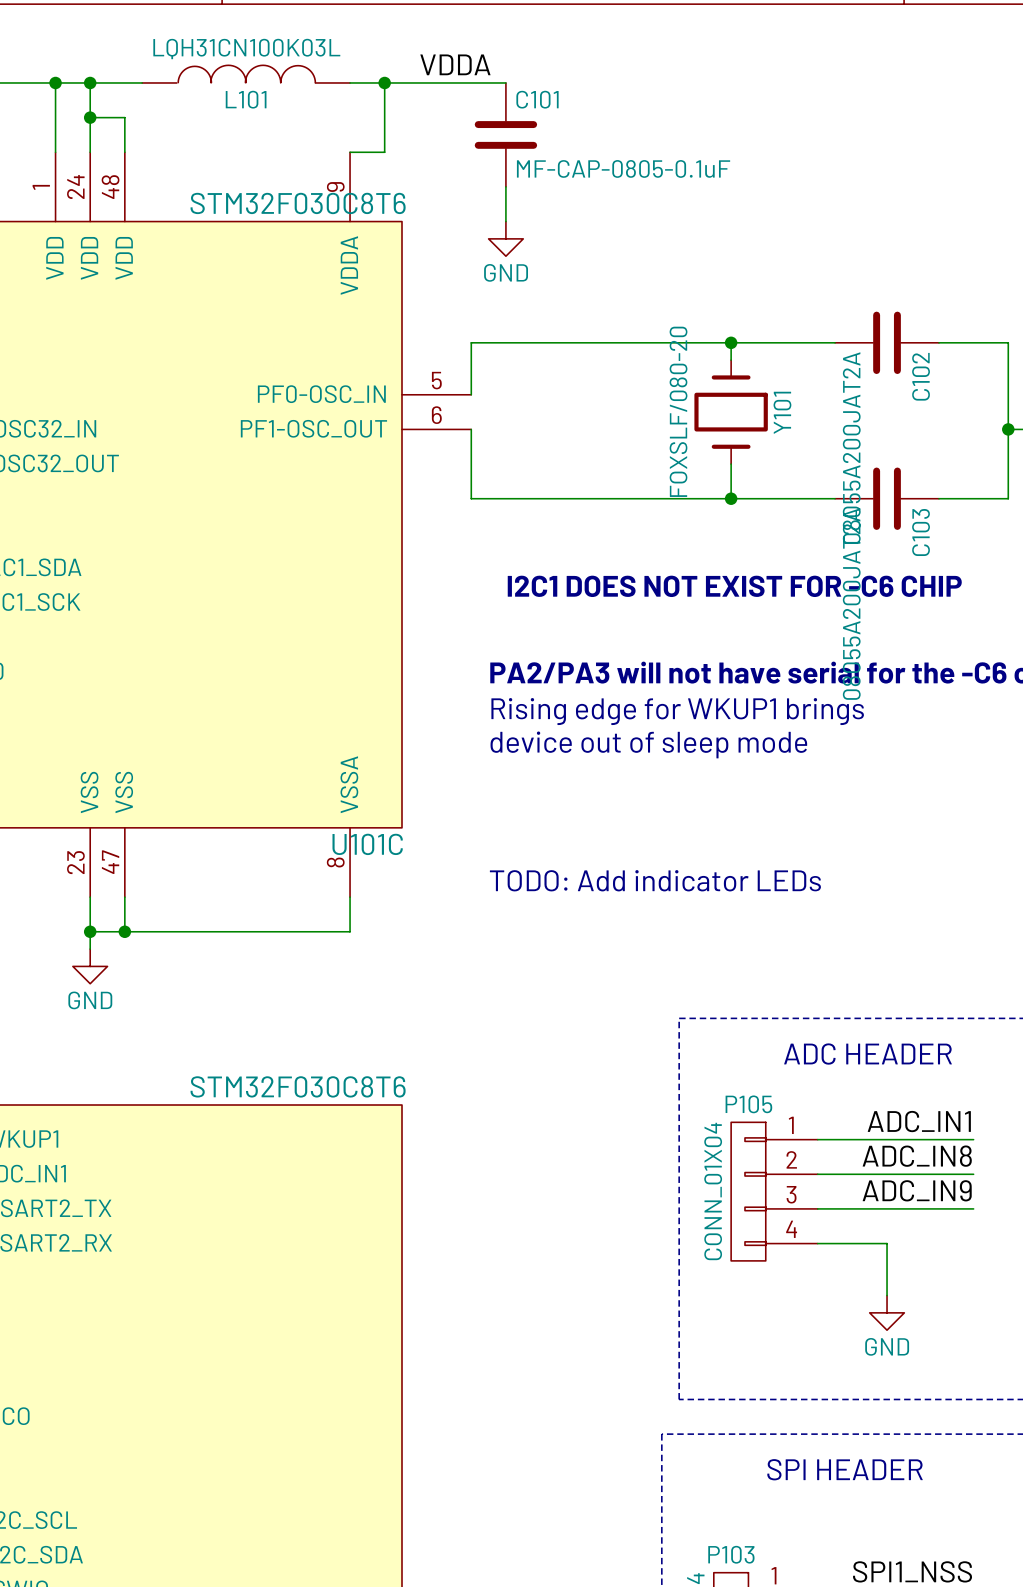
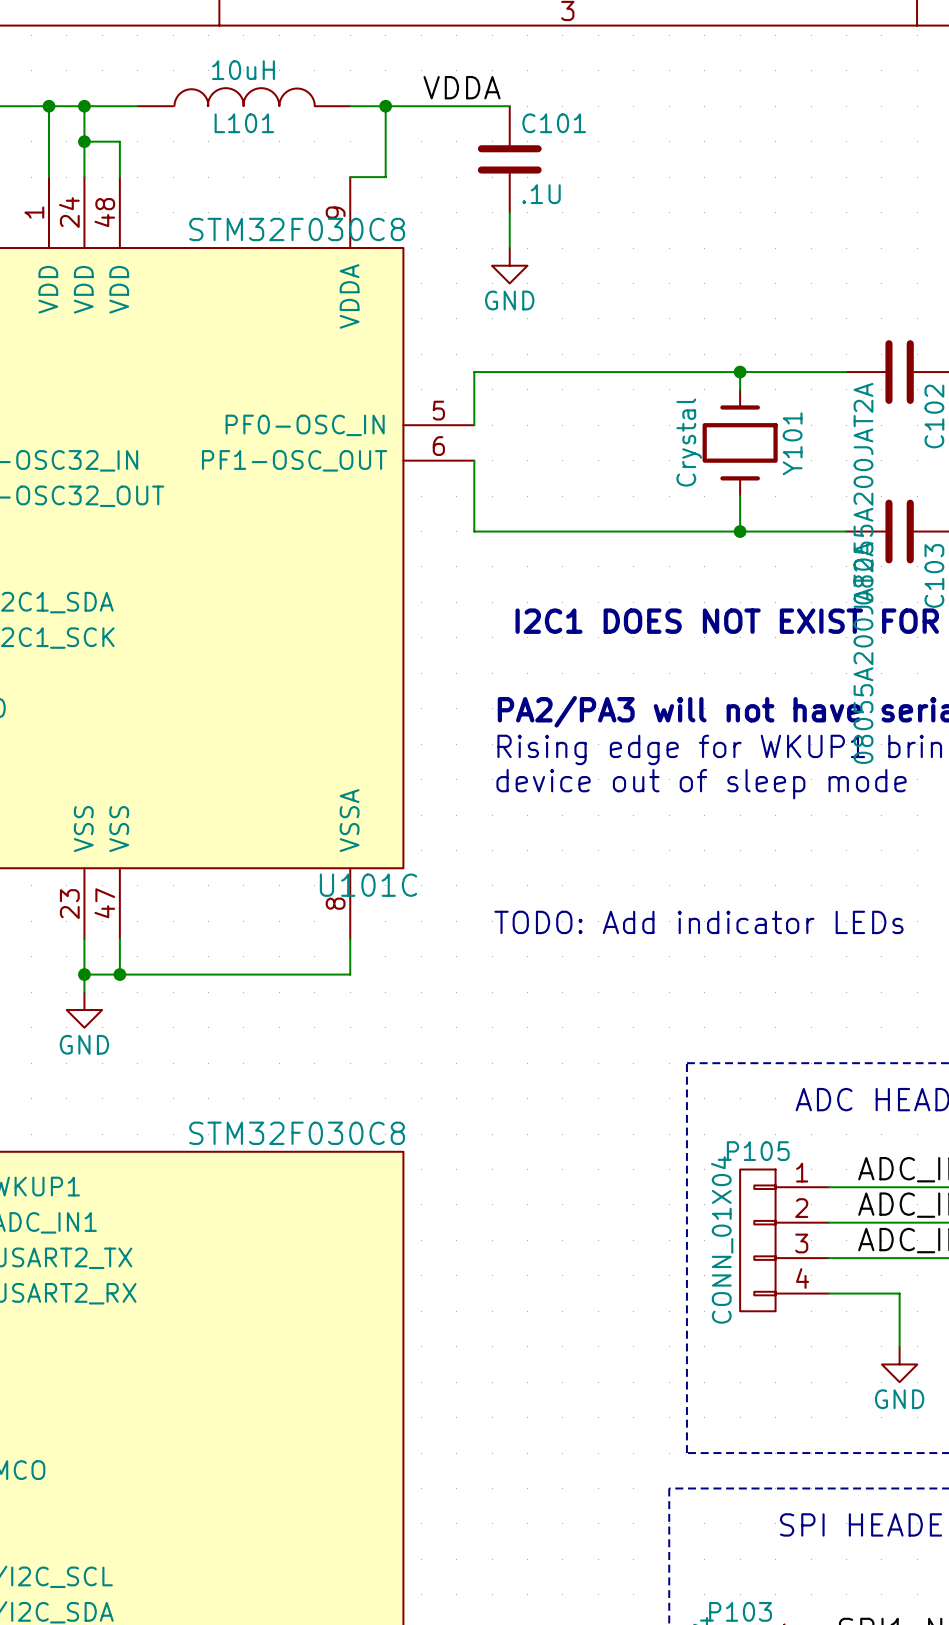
L101 value: LQH31CN100K03L (246, 49) -> 10uH (243, 70)
C101 value: MF-CAP-0805-0.1uF (623, 168) -> .1U (541, 194)
U101C value: STM32F030C8T6 (298, 203) -> STM32F030C8 (297, 229)
Y101 value: FOXSLF/080-20 (678, 411) -> Crystal (689, 442)
part value: STM32F030C8T6 (298, 1086) -> STM32F030C8 (297, 1133)

